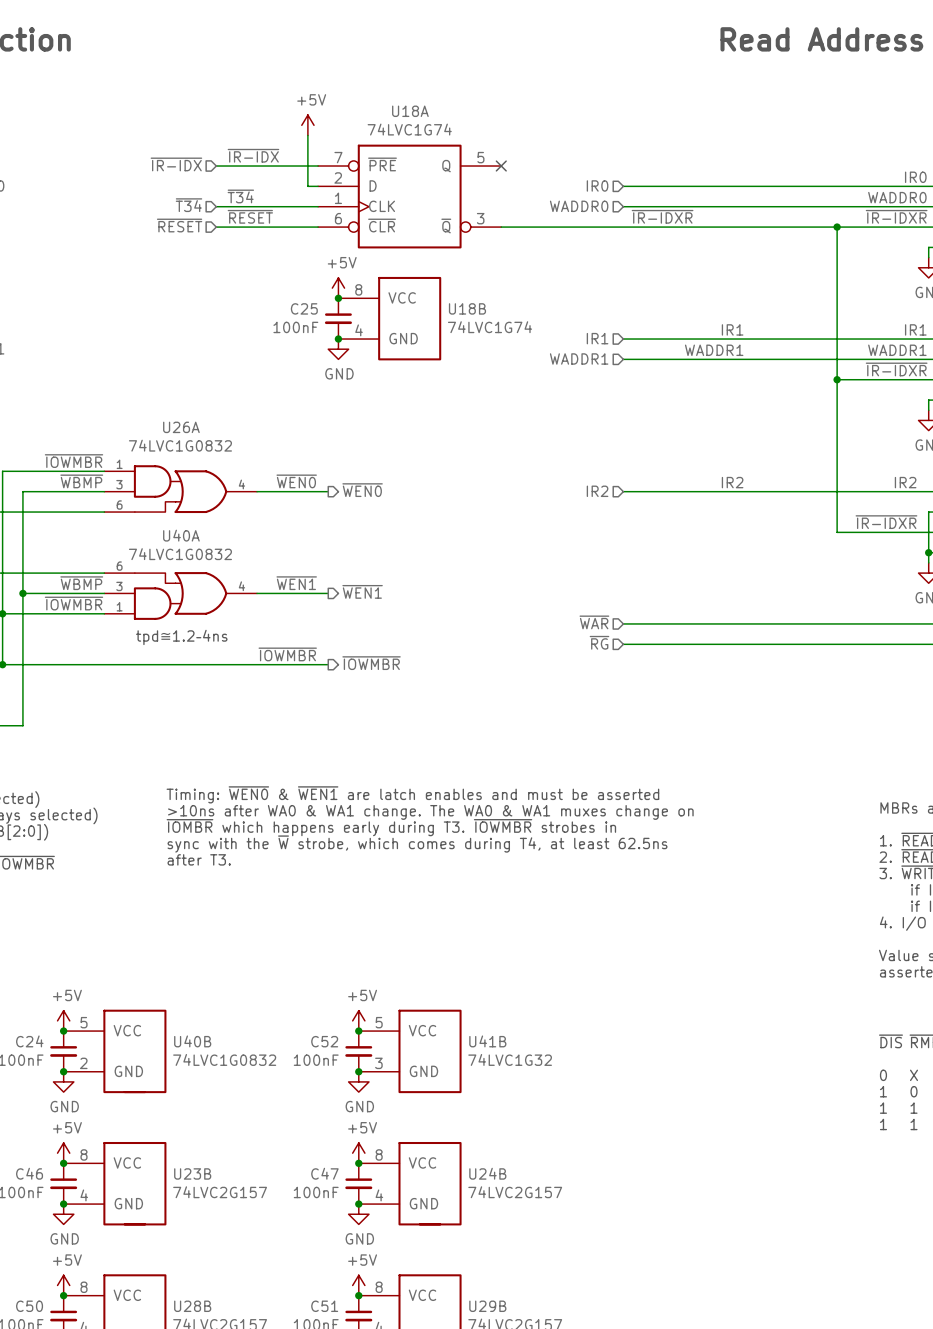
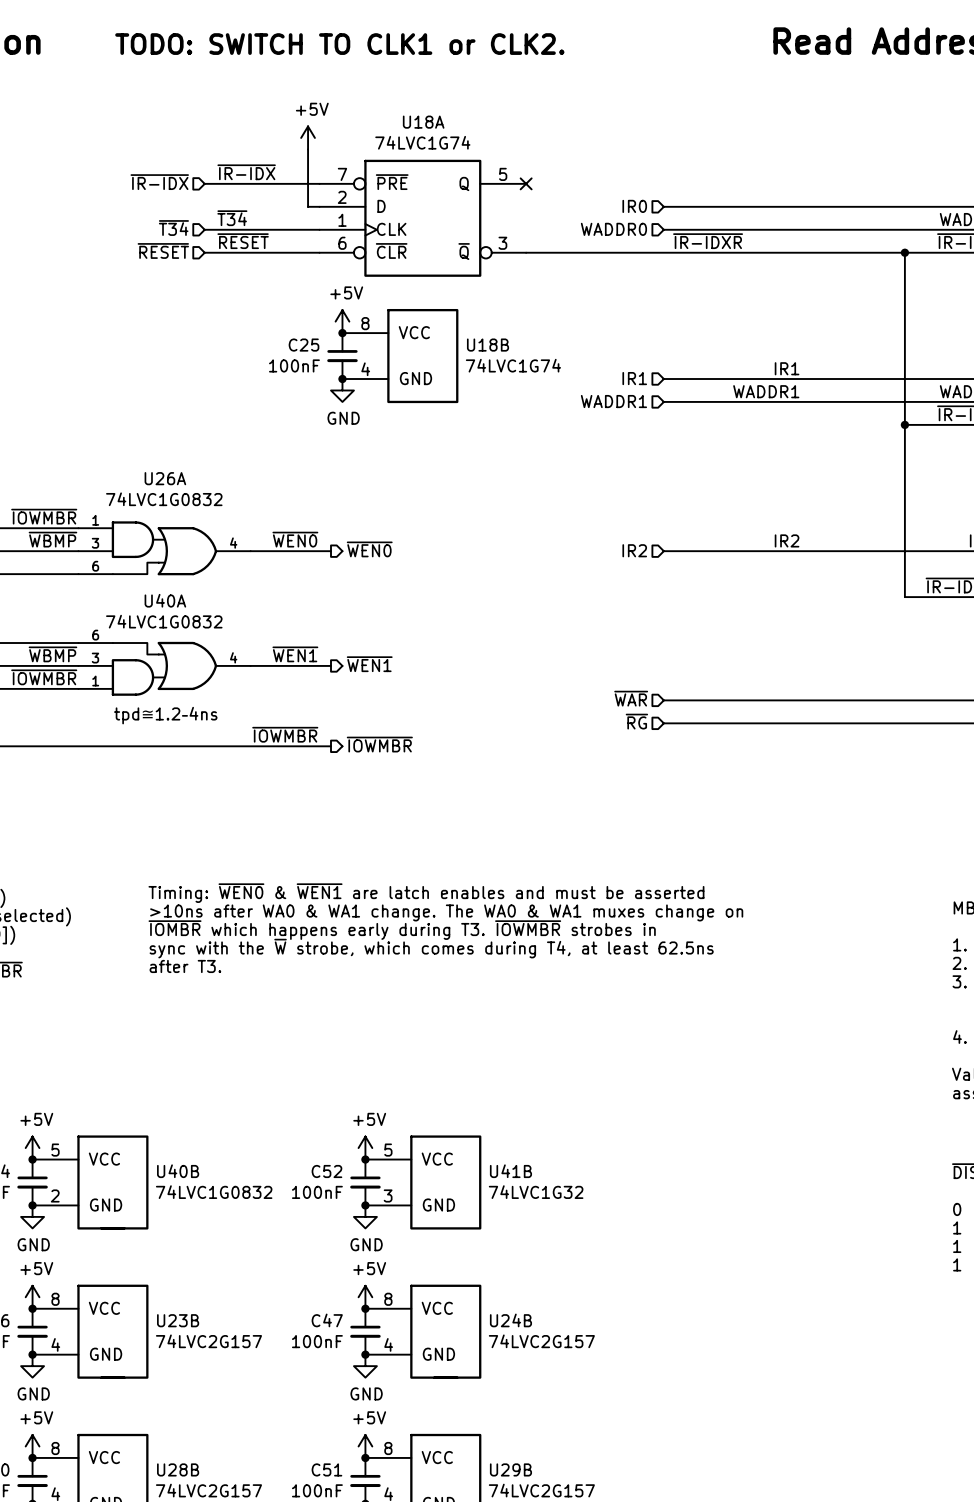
text: none -> TODO: SWITCH TO CLK1 or CLK2. (339, 44)

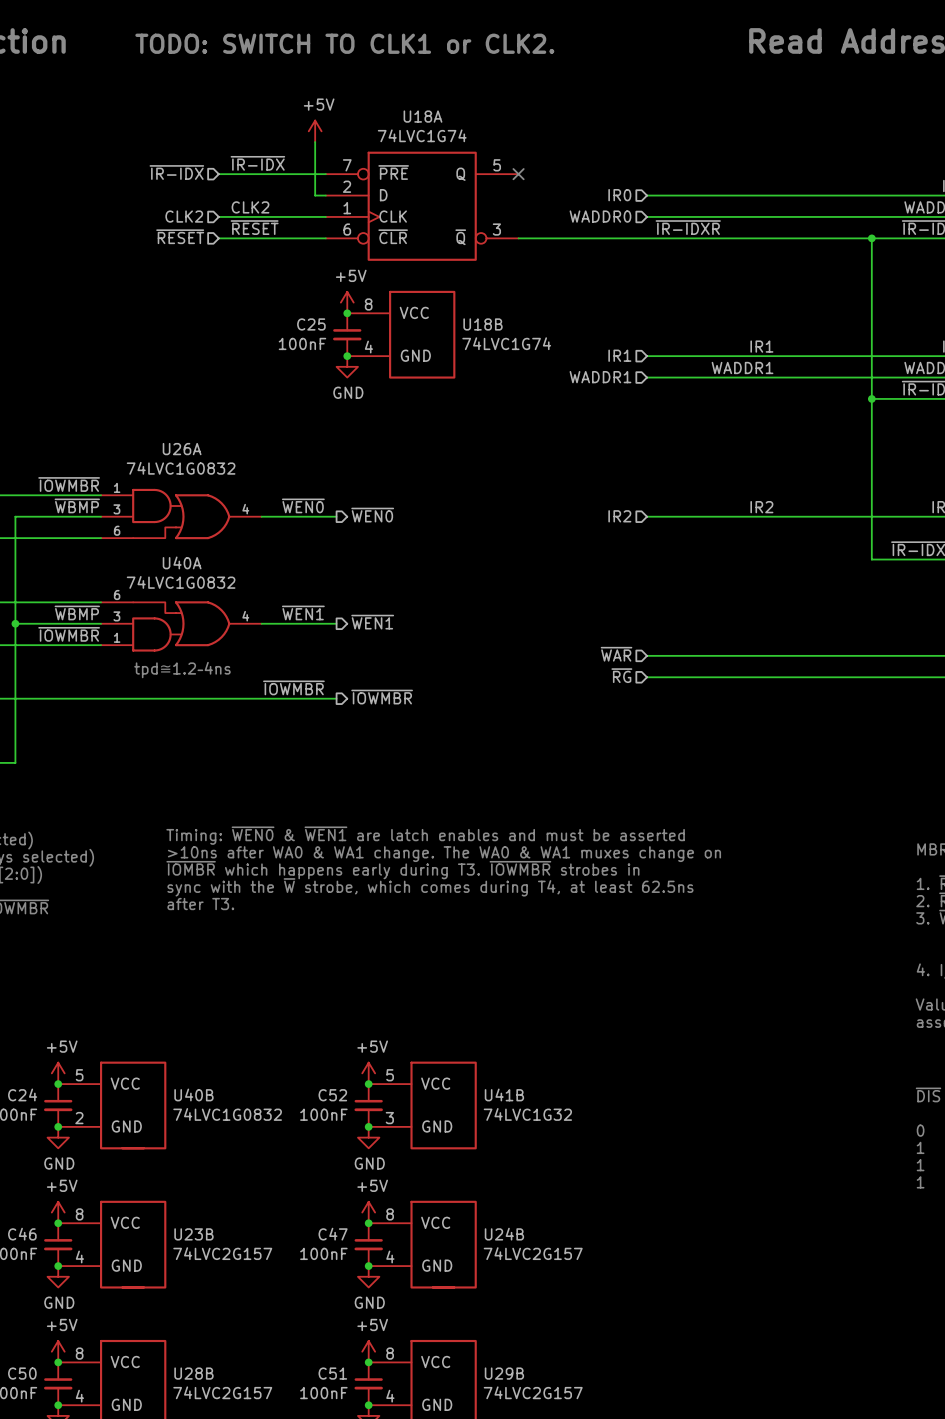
label: ~{T34} (232, 218) -> CLK2 (250, 207)
hierarchical label: ~{T34} (173, 228) -> CLK2 (184, 216)

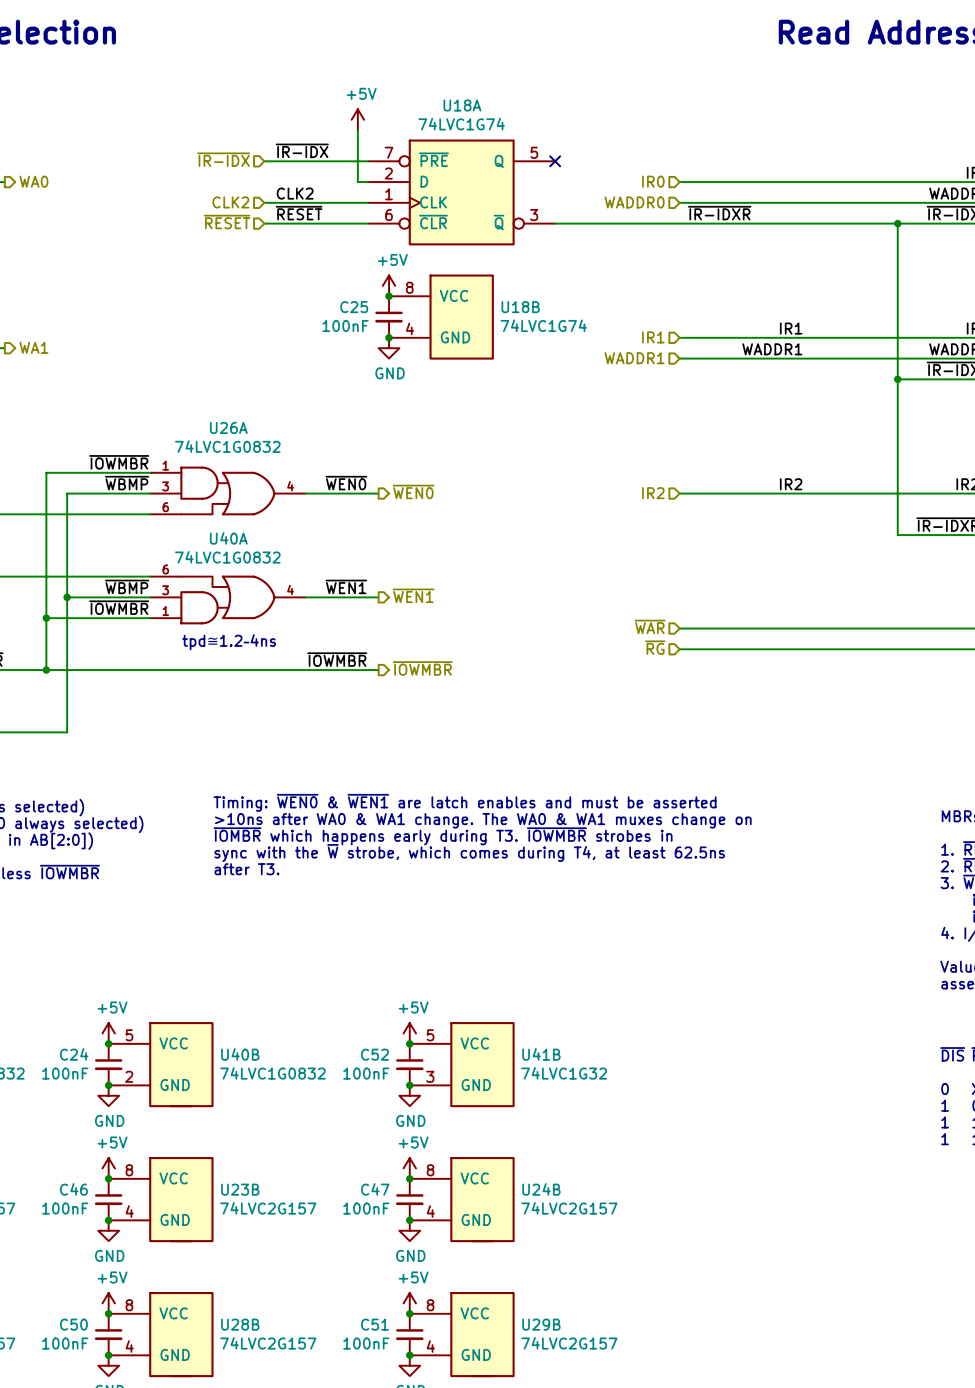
text: TODO: SWITCH TO CLK1 or CLK2. (344, 43) -> none

